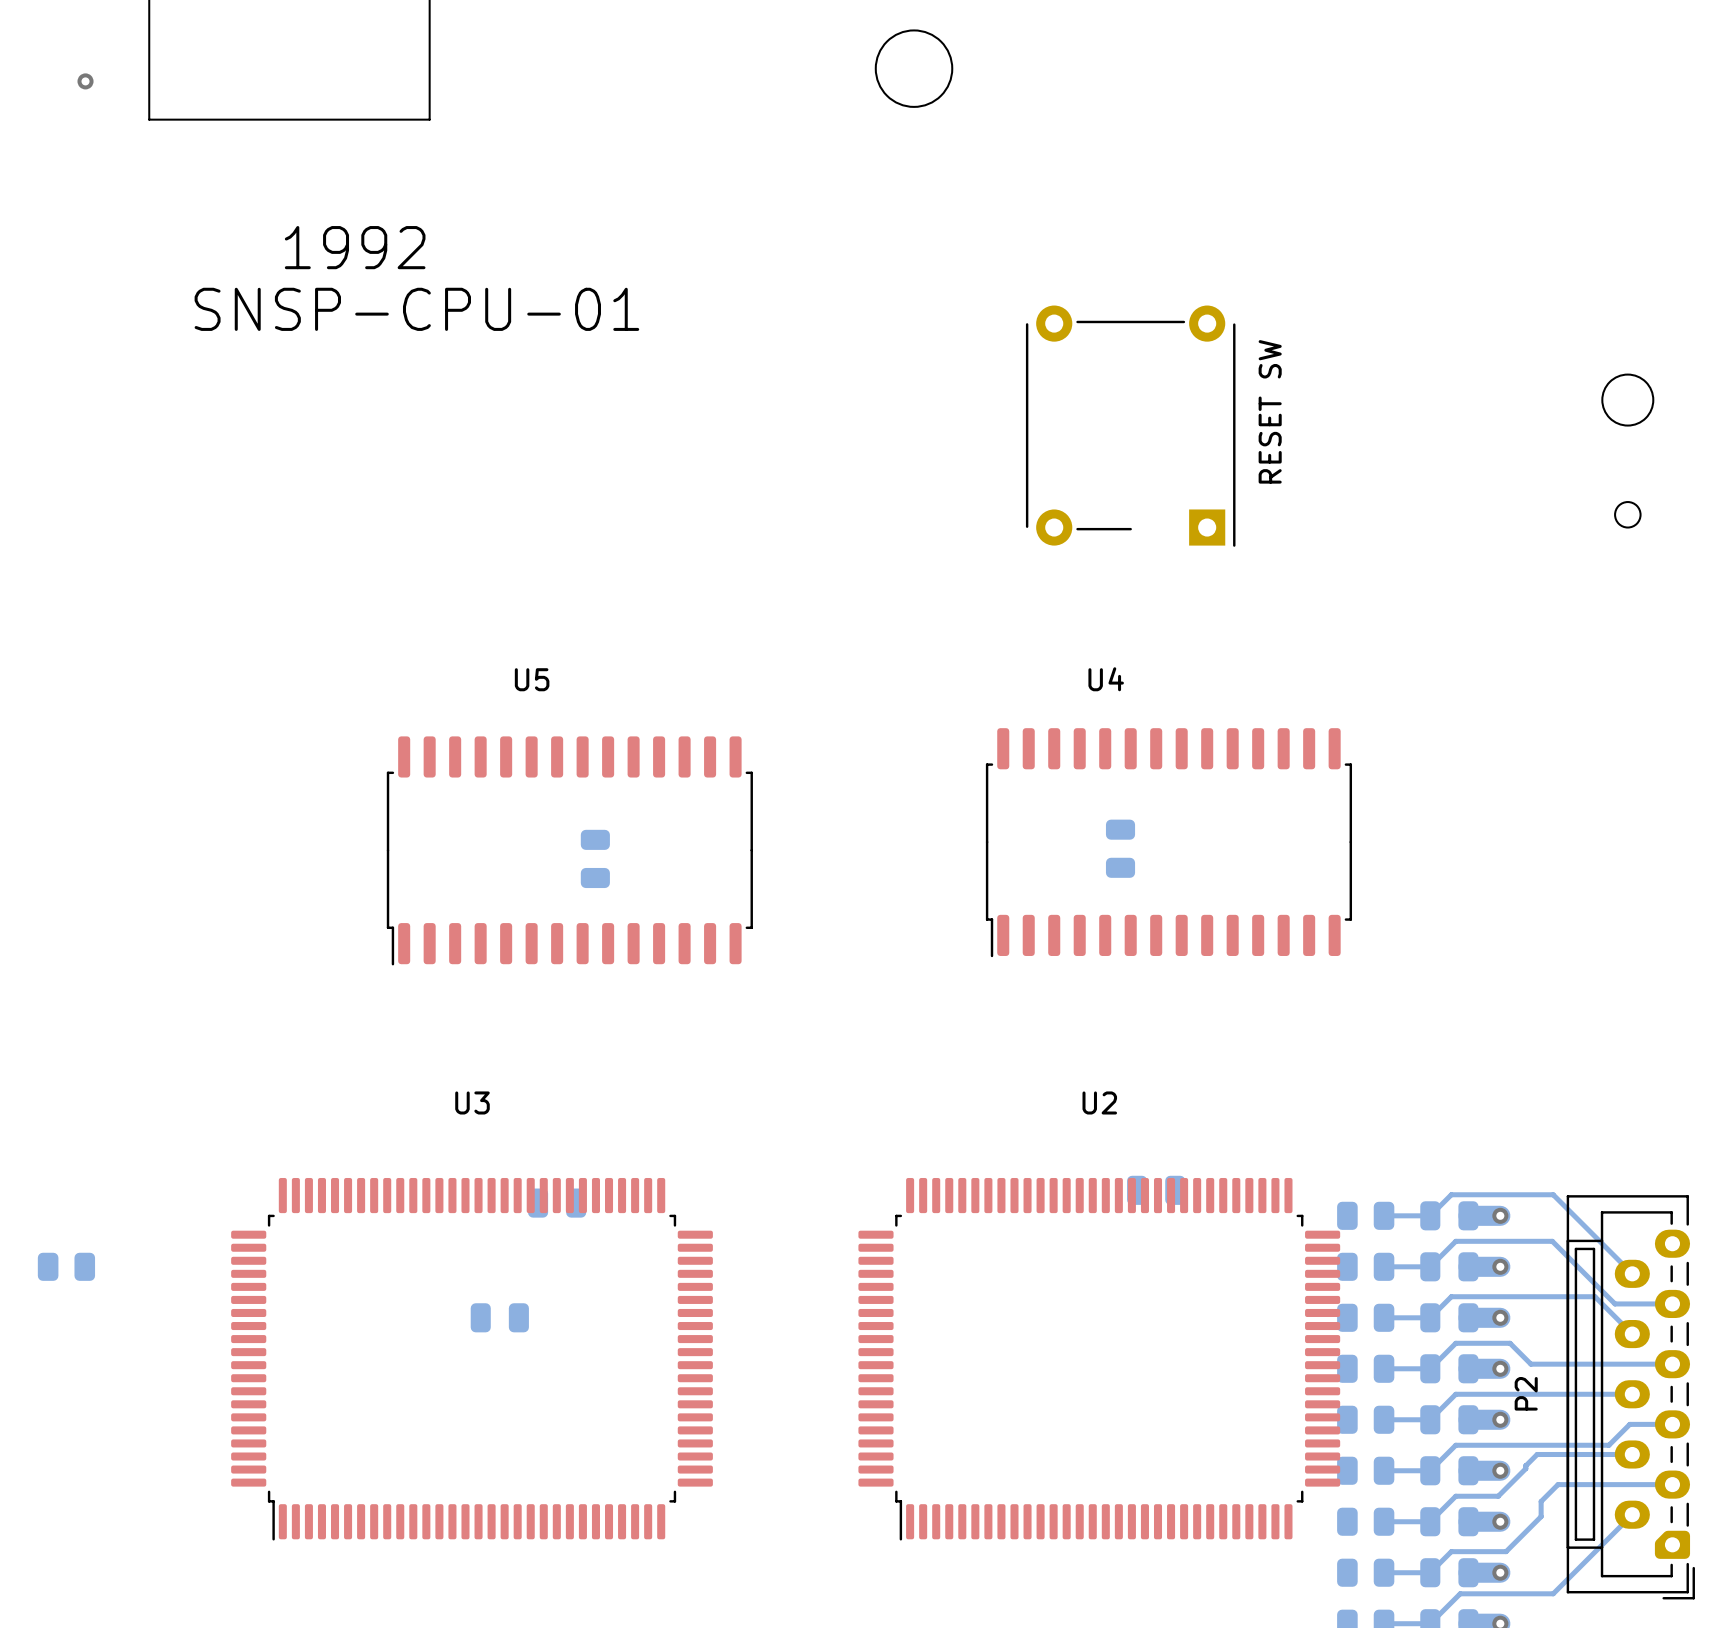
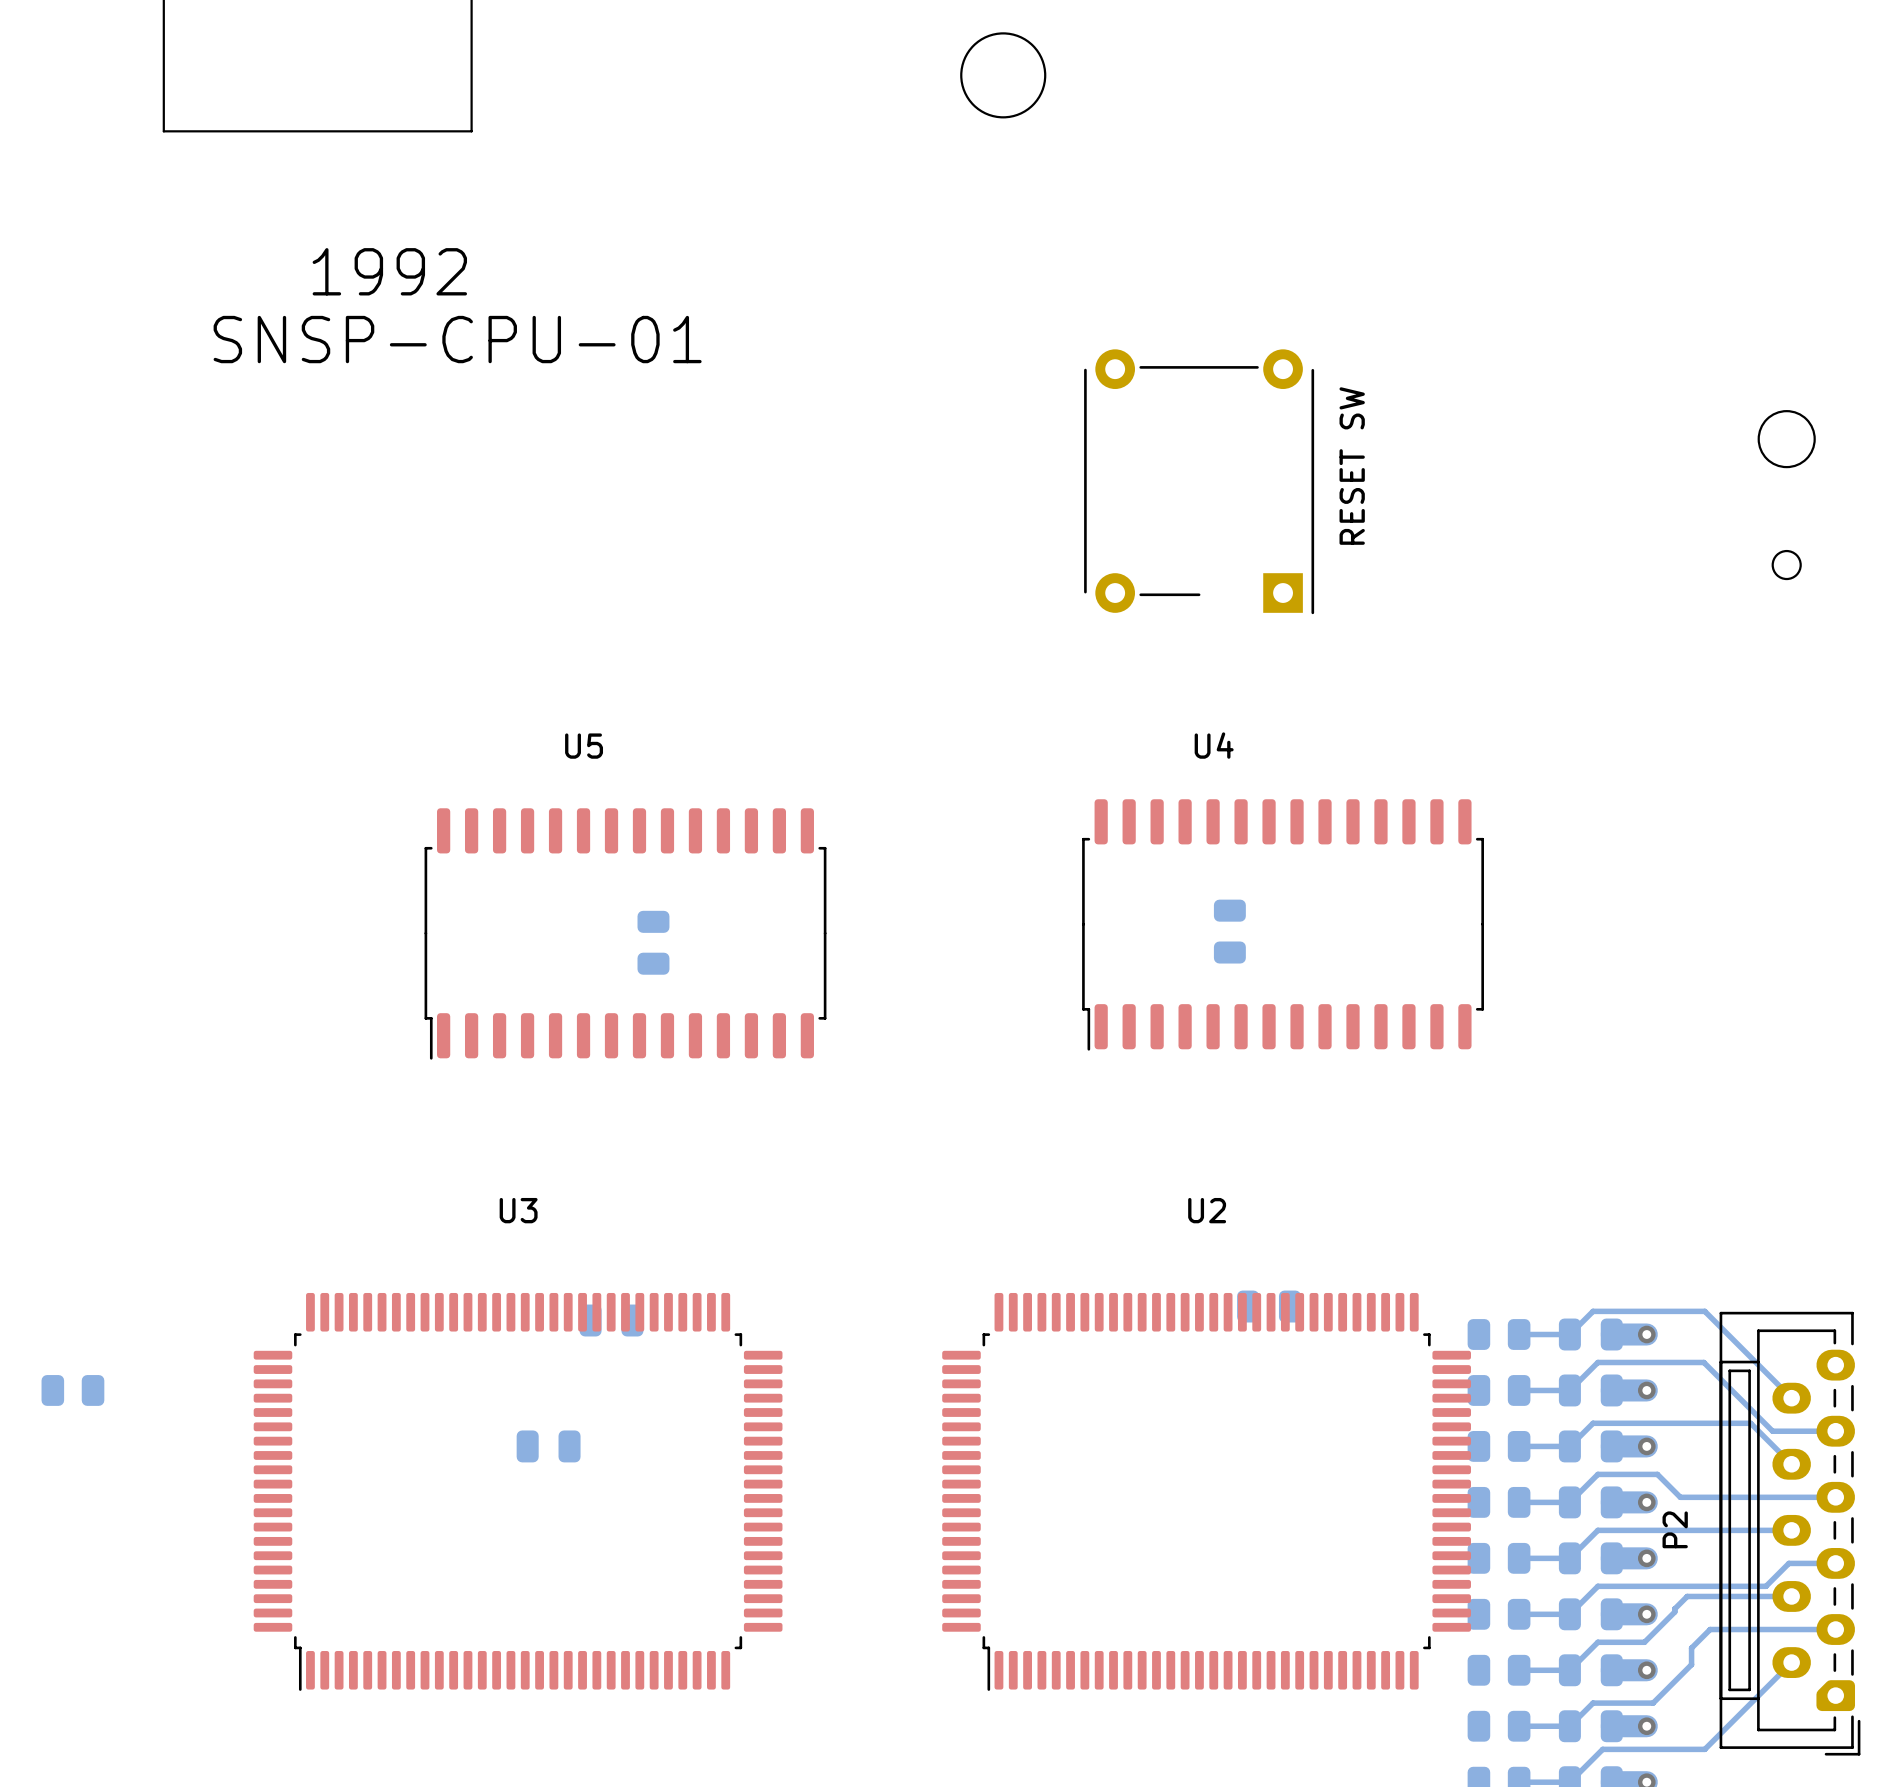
via: (85, 81) -> none
part position: (1130, 426) -> (1199, 481)

